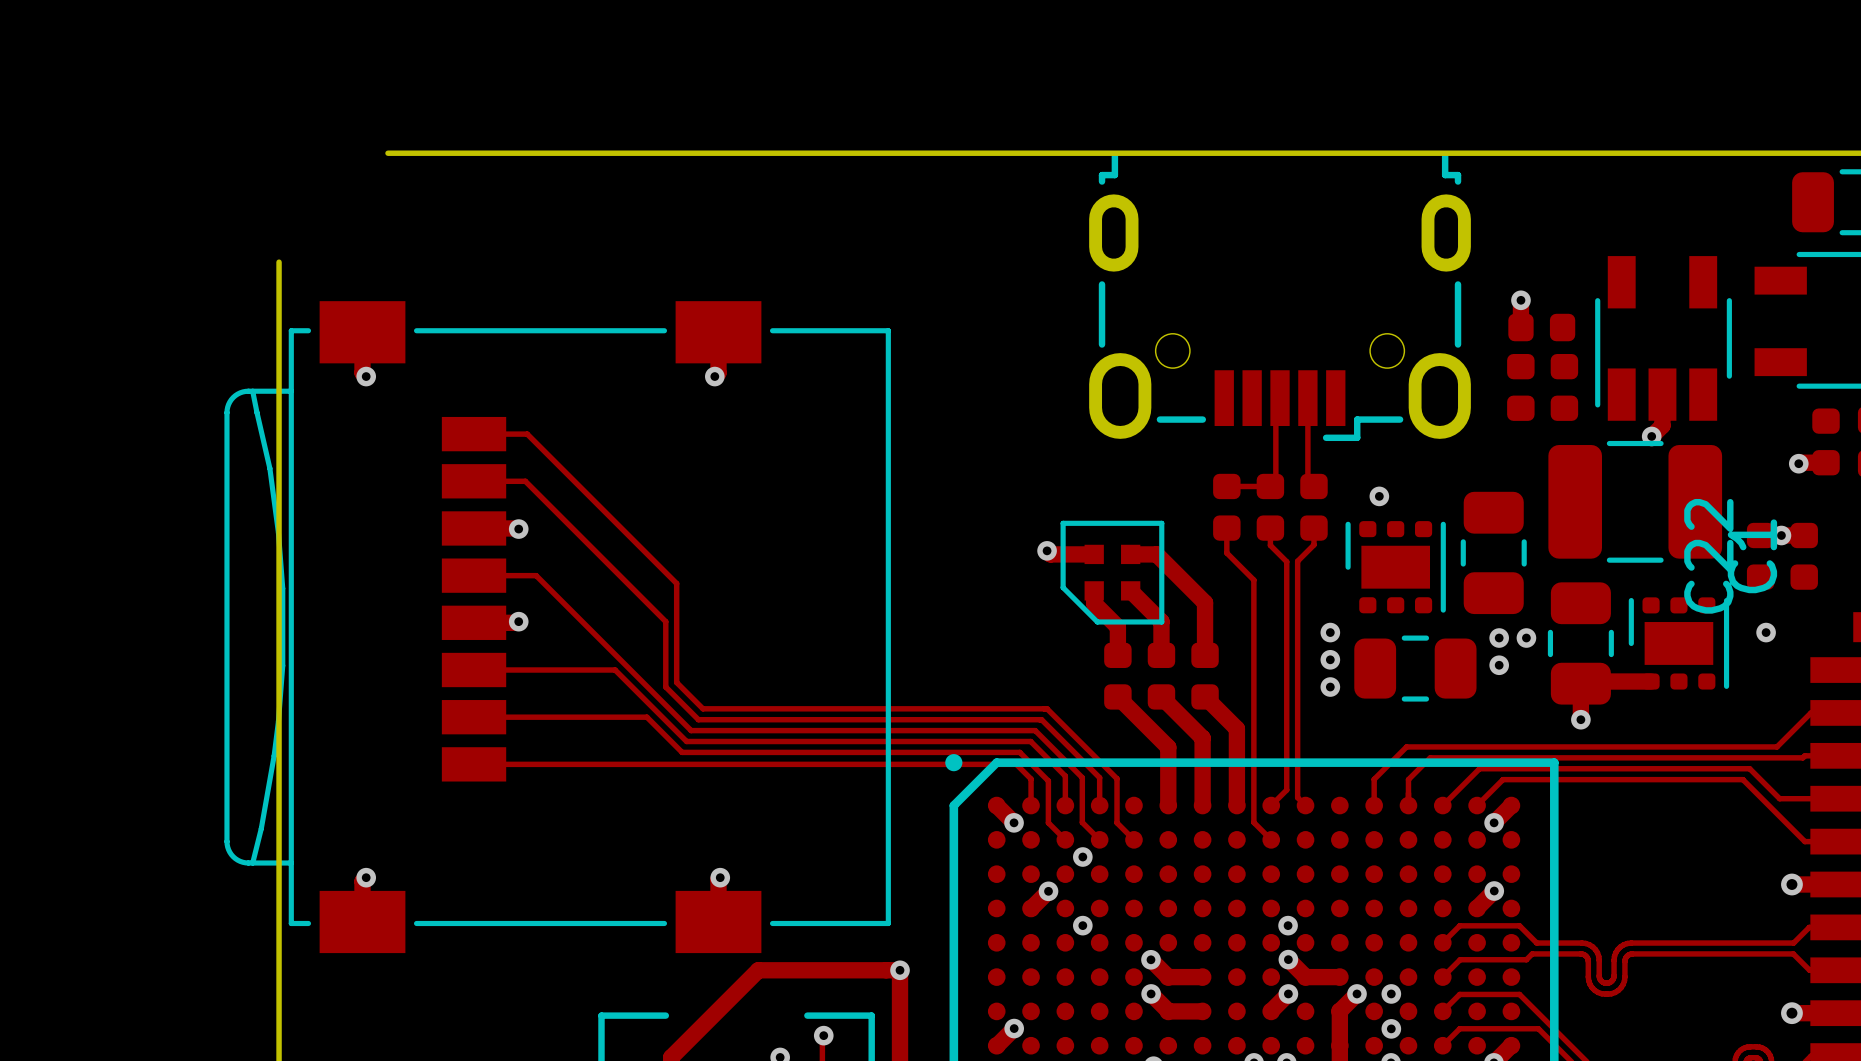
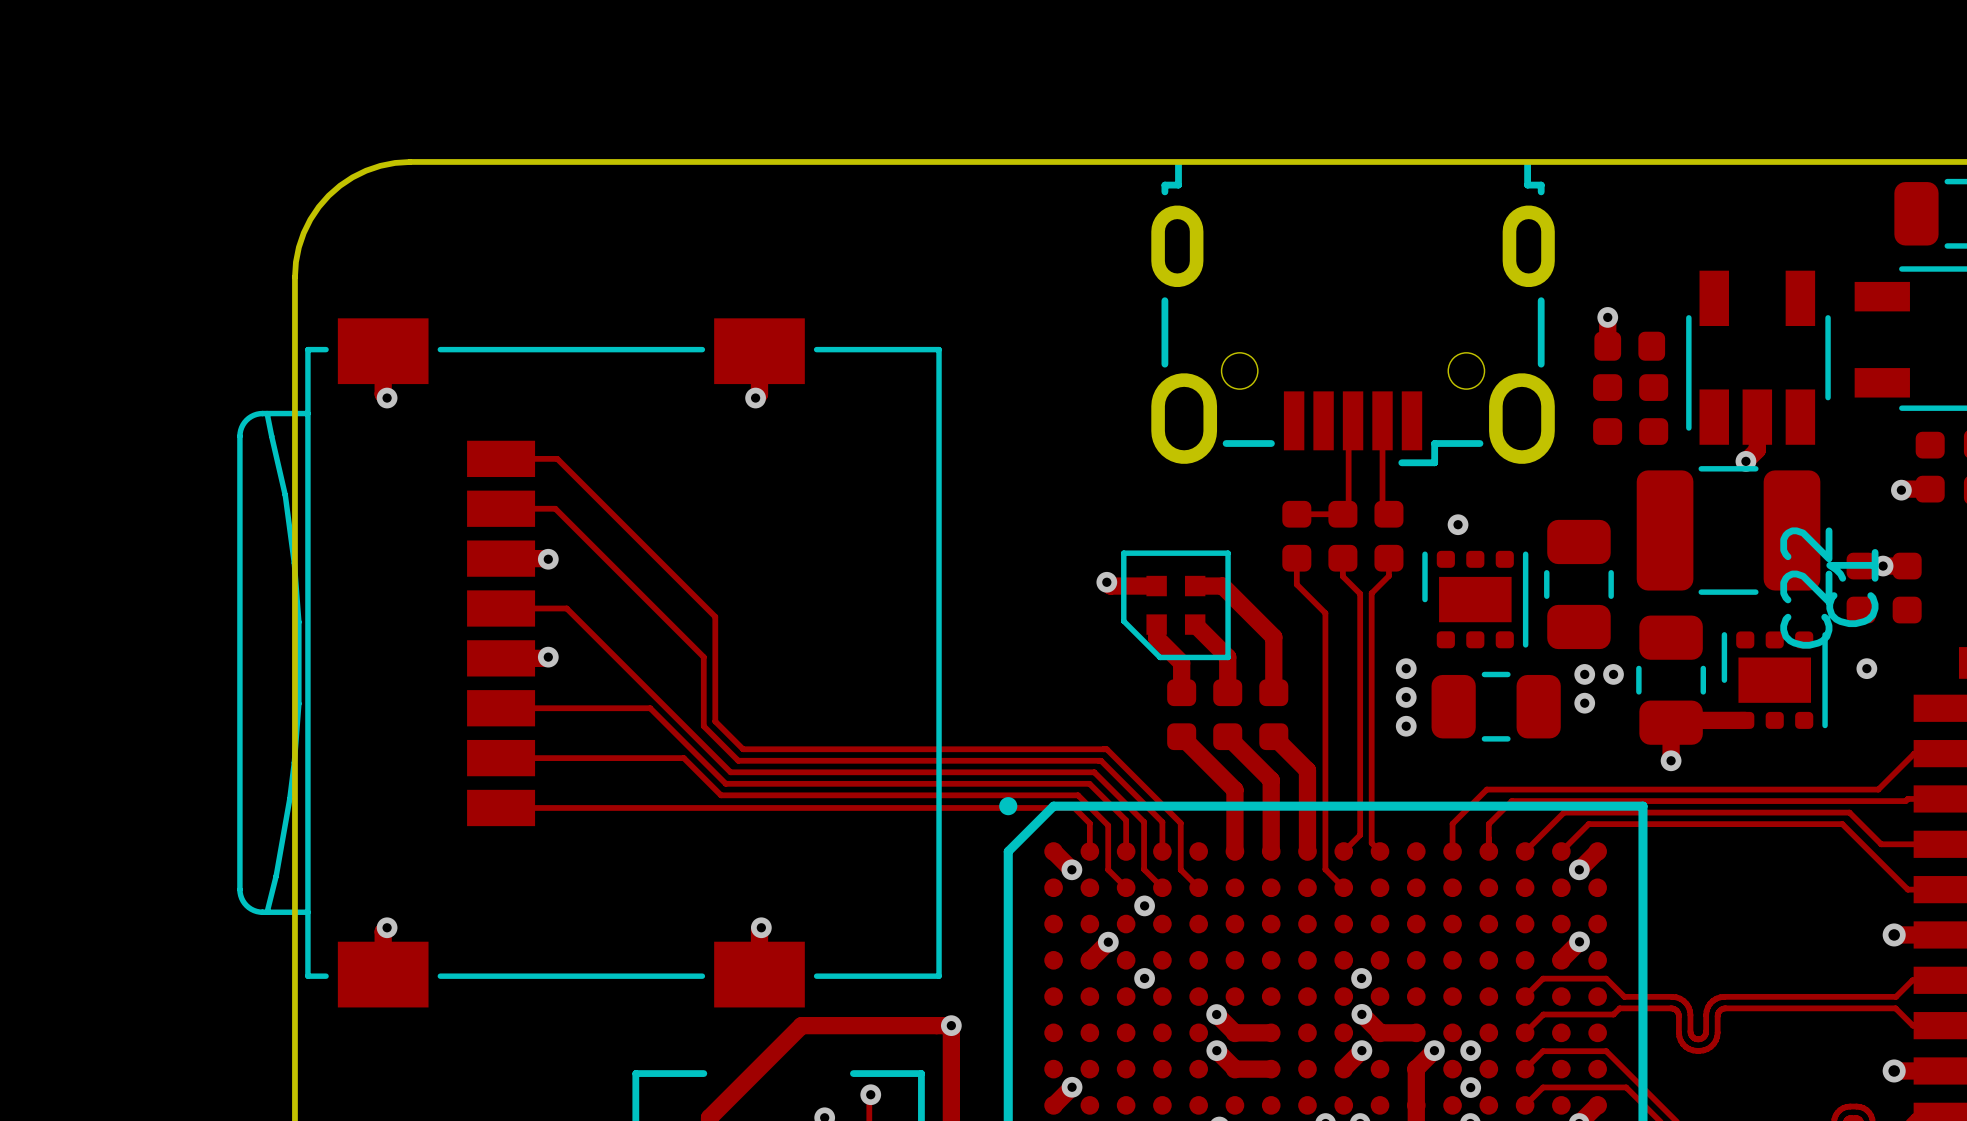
board edge: none -> (410, 161) (395, 162) (366, 170) (340, 185) (328, 195) (310, 219) (303, 233) (295, 262) (294, 277)

